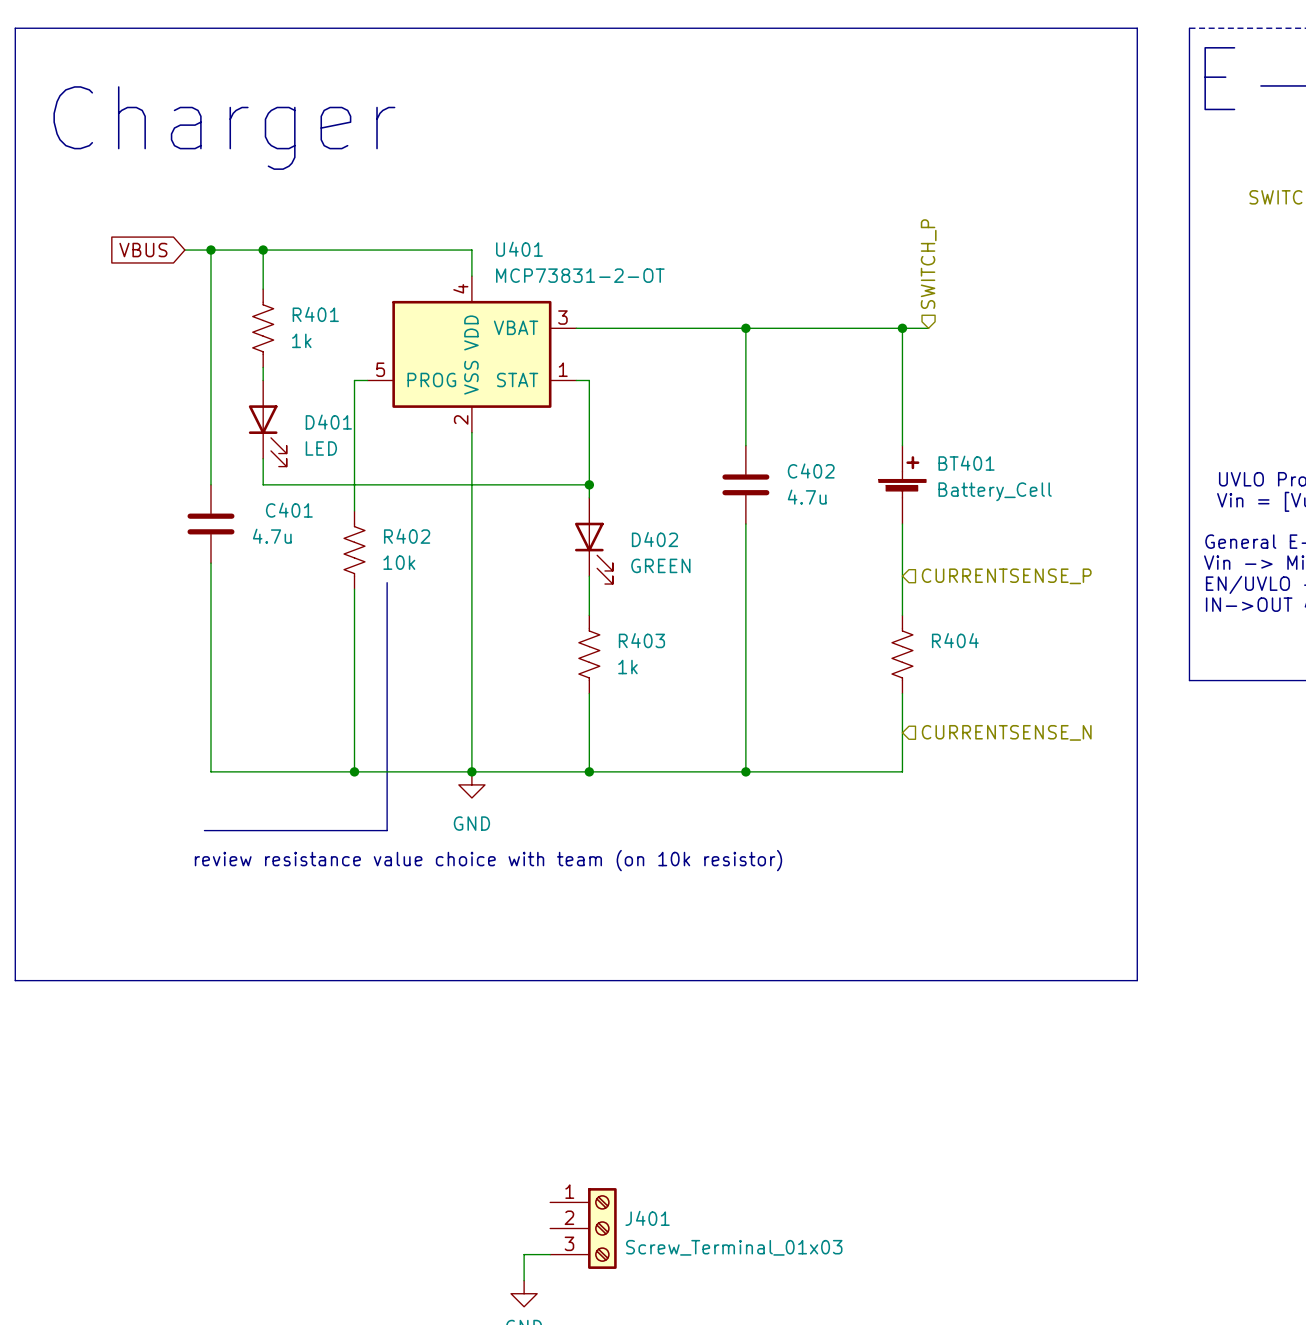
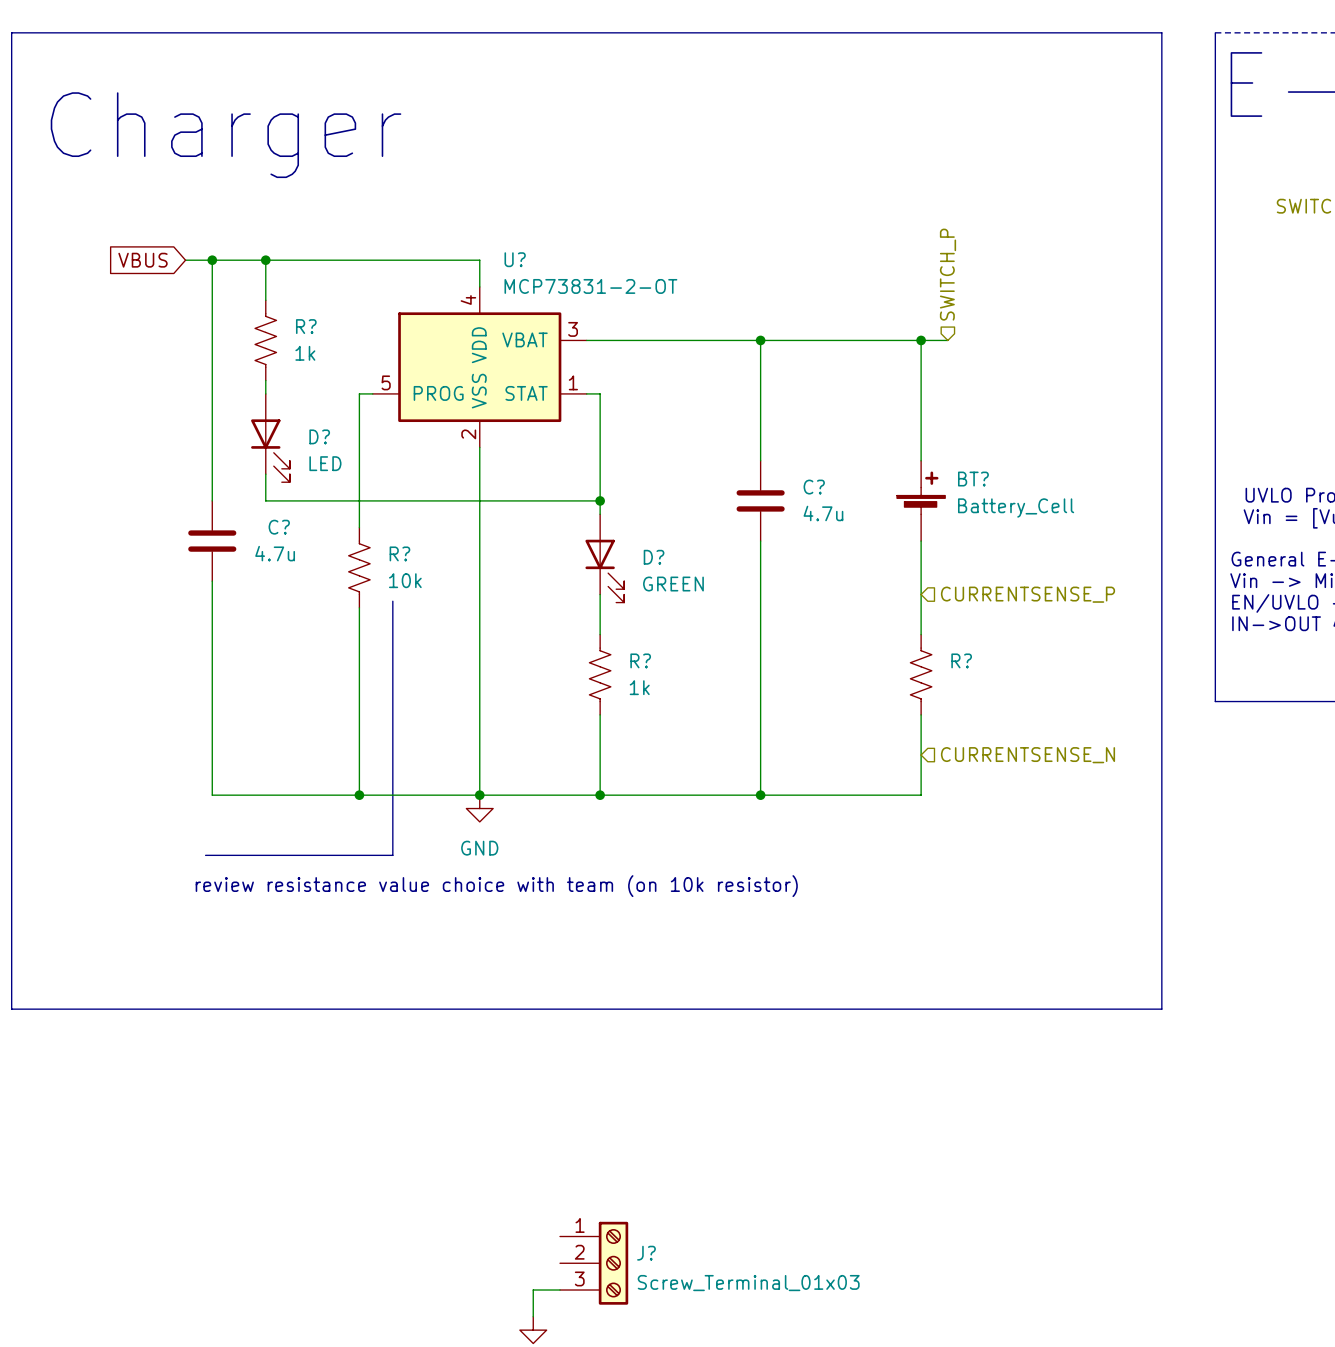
U401 name: U401 (519, 249) -> U? (515, 259)
R401 name: R401 (315, 314) -> R? (306, 326)
D401 name: D401 (328, 422) -> D? (319, 436)
BT401 name: BT401 (966, 463) -> BT? (973, 479)
C402 name: C402 (811, 471) -> C? (814, 487)
C401 name: C401 (289, 510) -> C? (279, 527)
R402 name: R402 (407, 536) -> R? (399, 553)
D402 name: D402 (654, 539) -> D? (654, 557)
R403 name: R403 (641, 640) -> R? (640, 660)
R404 name: R404 (955, 640) -> R? (961, 660)
J401 name: J401 (647, 1218) -> J? (646, 1253)

